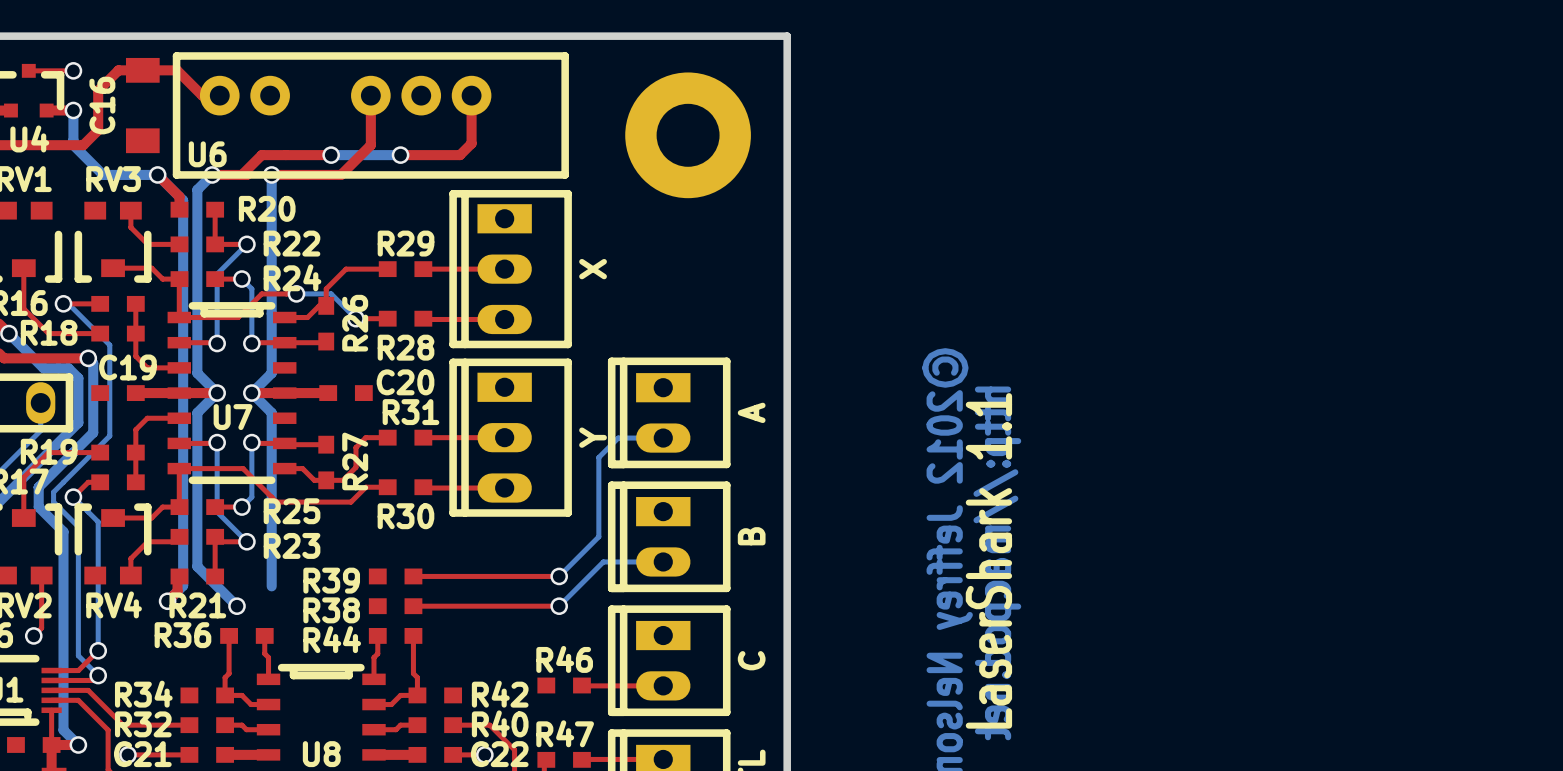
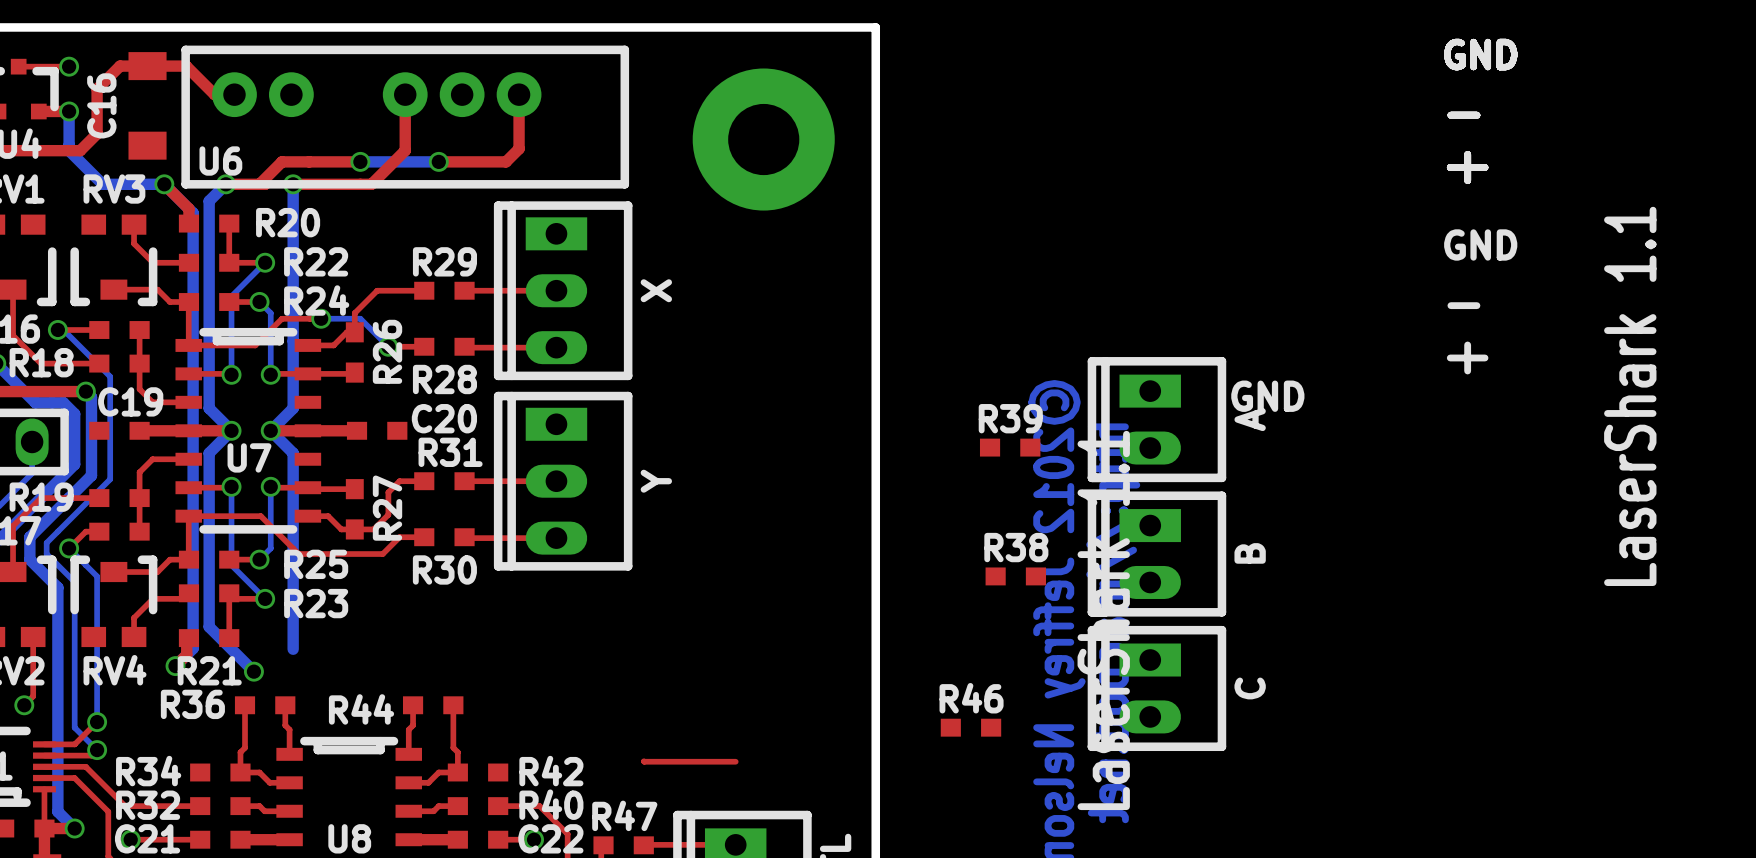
text: none -> GND (1480, 54)
text: none -> - (1463, 115)
text: none -> + (1467, 167)
text: none -> GND (1480, 244)
text: none -> - (1463, 305)
text: none -> + (1467, 357)
text: none -> GND (1267, 396)
text: none -> LaserShark 1.1 (1630, 396)
part position: (669, 412) -> (1156, 419)
bottom track: (663, 438) (618, 438) (598, 457) (598, 536) (559, 576) -> none
part position: (669, 536) -> (1156, 554)
bottom track: (663, 561) (603, 561) (559, 606) -> none
R39 position: (395, 576) -> (1010, 447)
top track: (413, 576) (559, 576) -> none
via: (559, 576) -> none
R39 name position: R39 (331, 580) -> R39 (1010, 418)
R38 position: (395, 606) -> (1015, 576)
top track: (413, 606) (559, 606) -> none
via: (559, 606) -> none
R38 name position: R38 (331, 610) -> R38 (1016, 547)
part position: (669, 660) -> (1156, 688)
R46 position: (564, 685) -> (970, 727)

